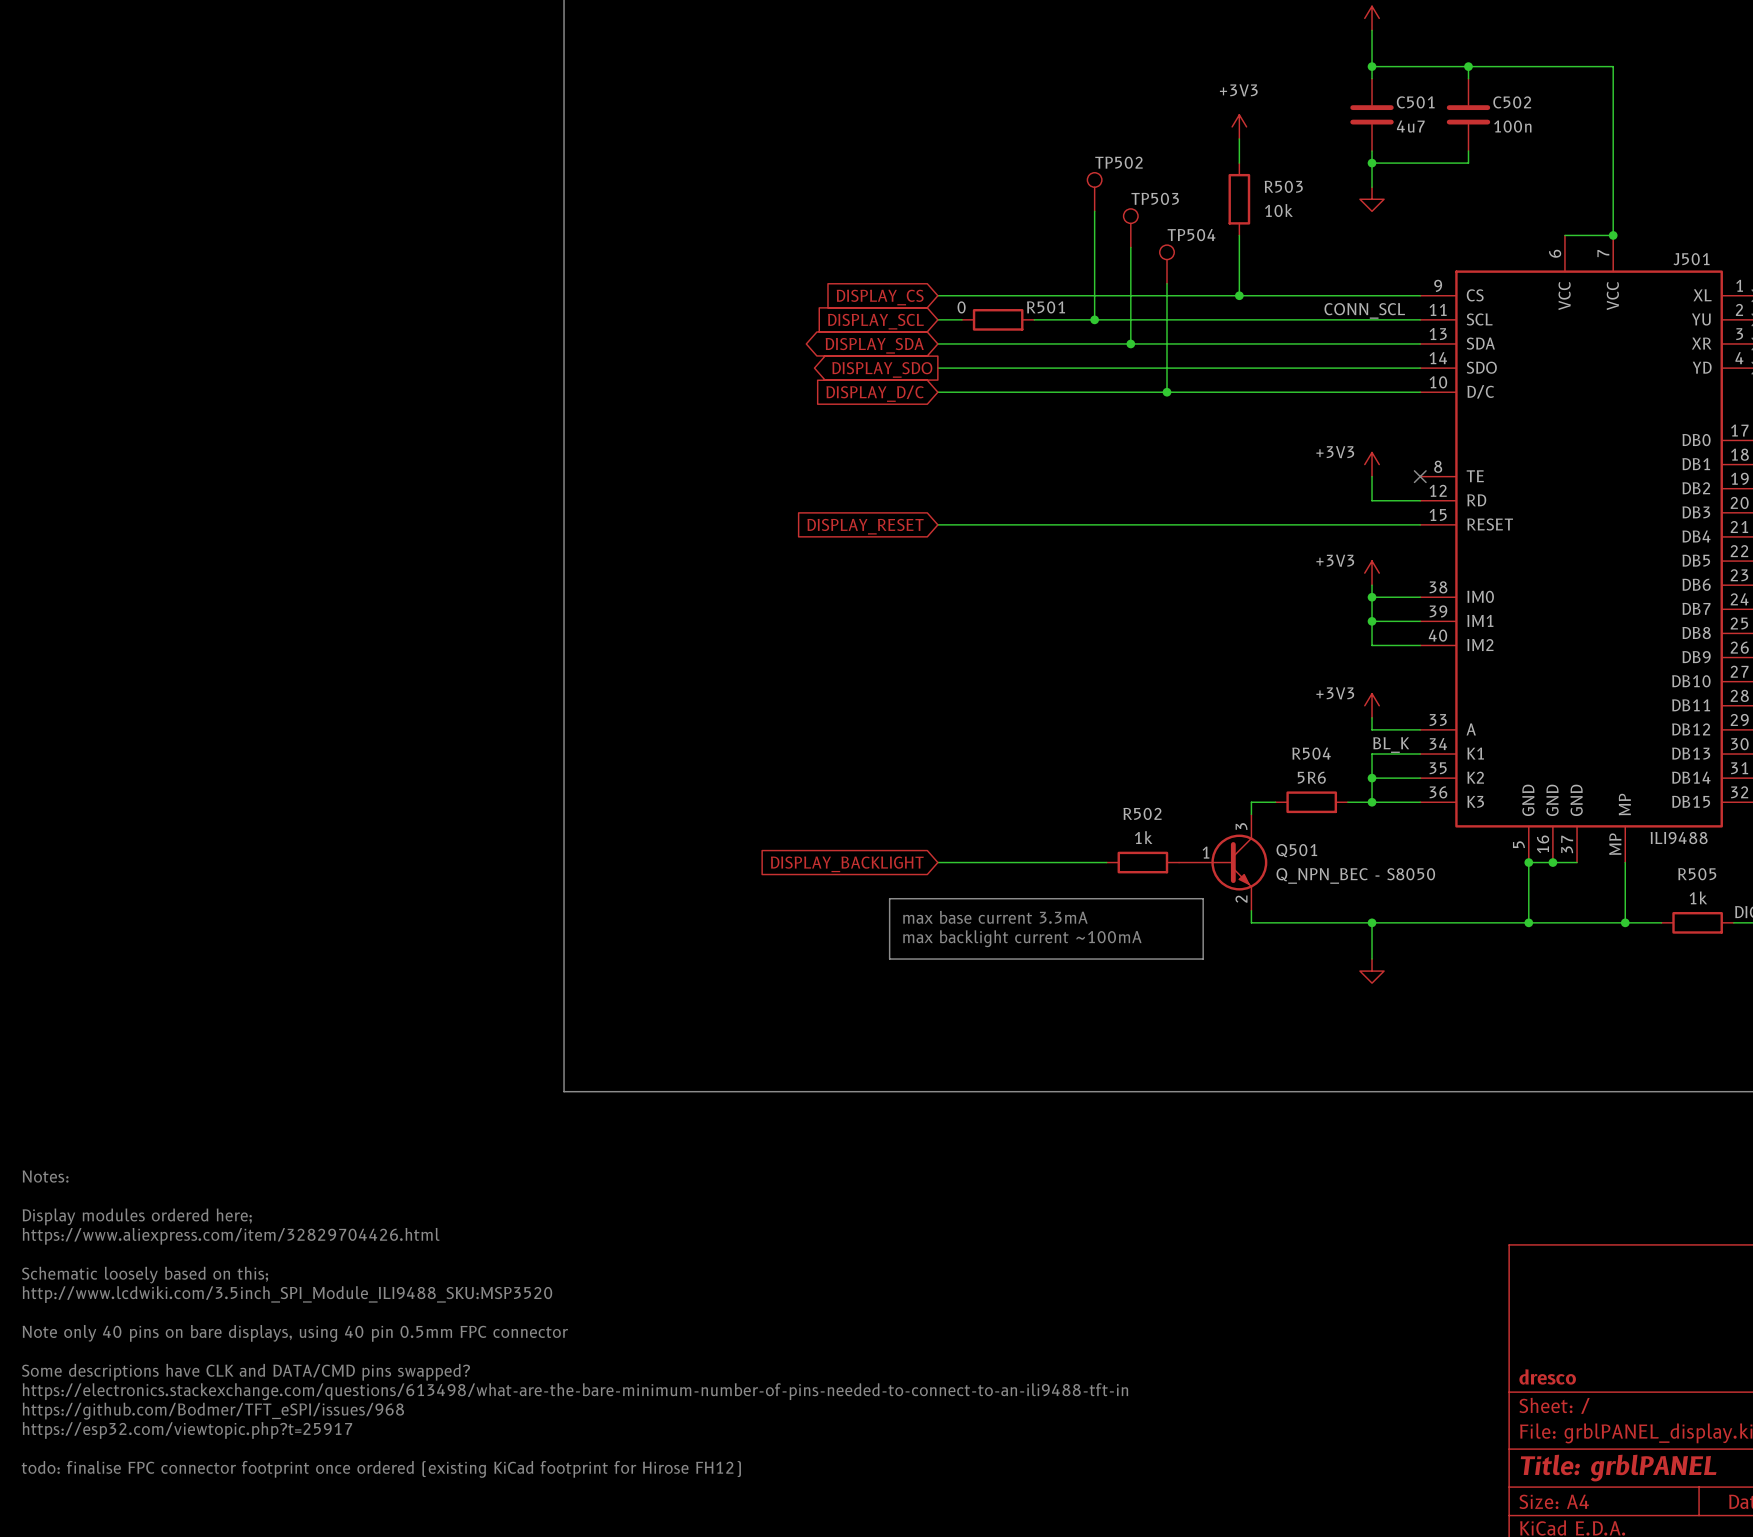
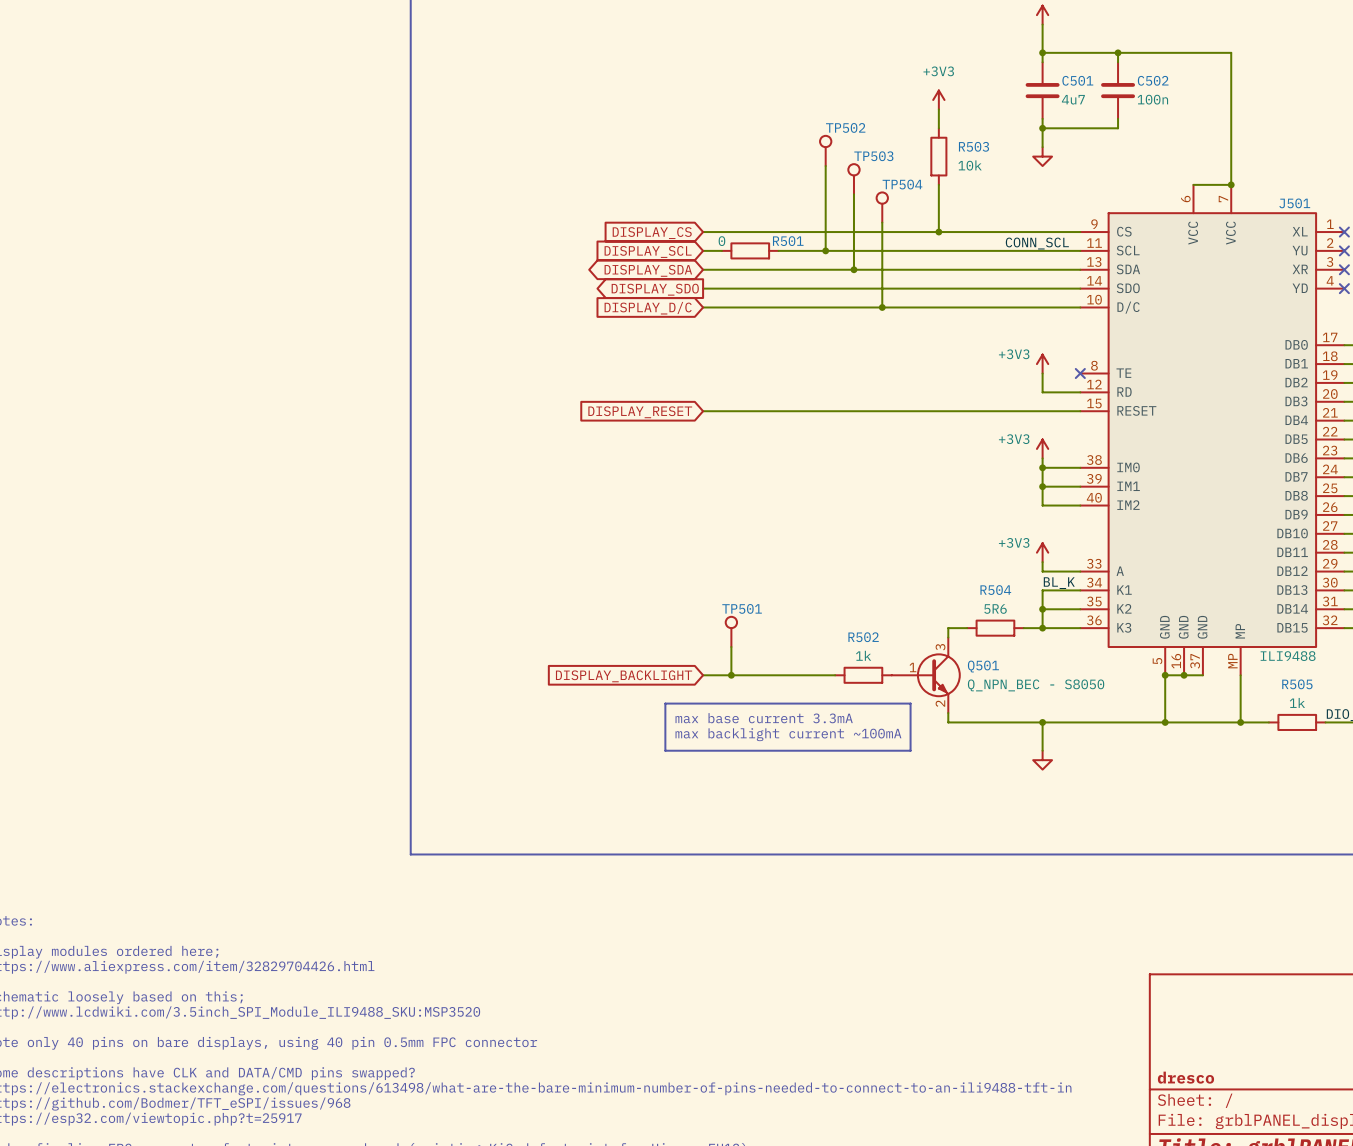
TP501: none -> (731, 631)
wire: none -> (731, 646) (731, 675)
junction: none -> (731, 675)

